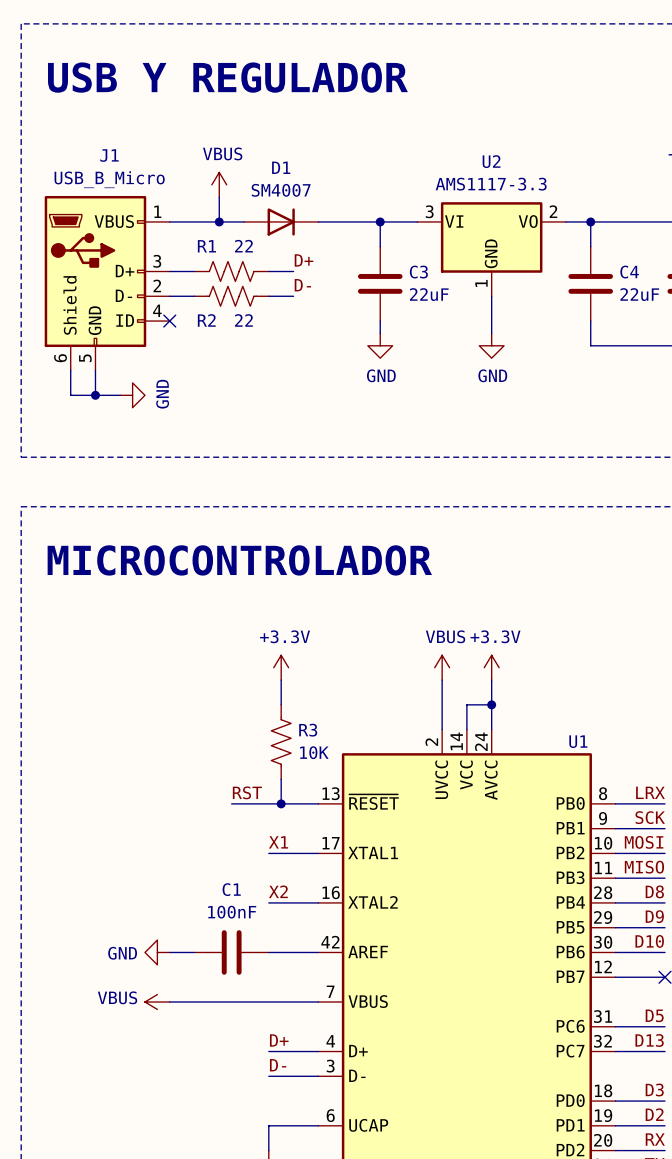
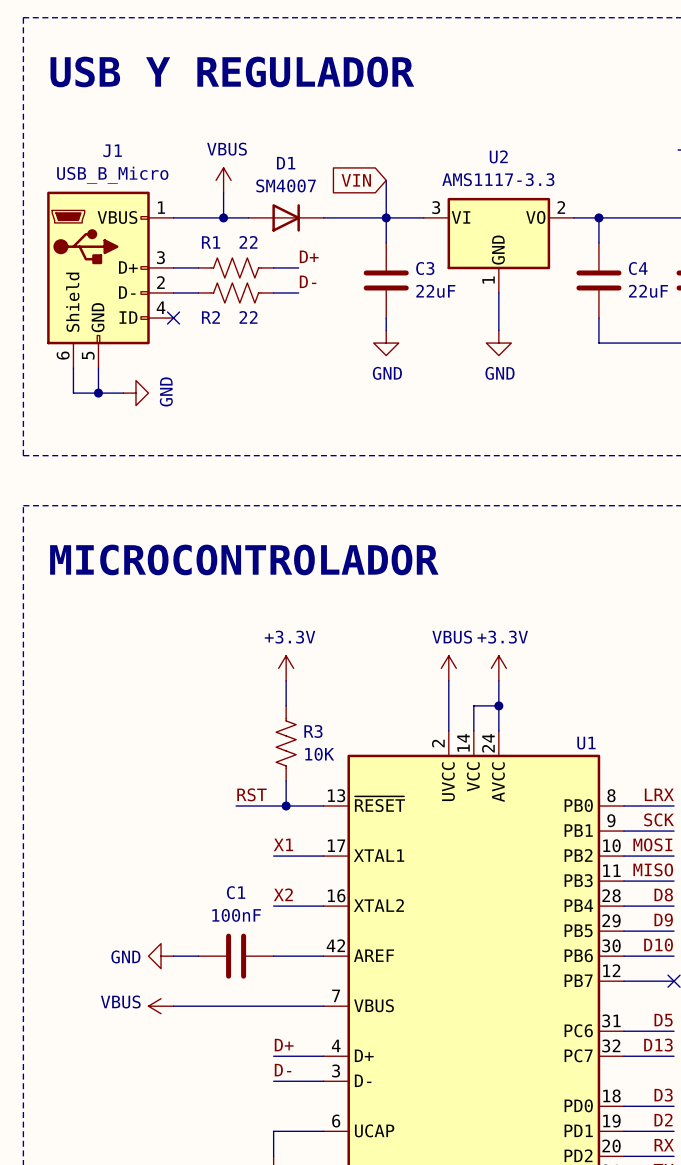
global label: none -> VIN (356, 180)
wire: none -> (386, 180) (386, 217)

